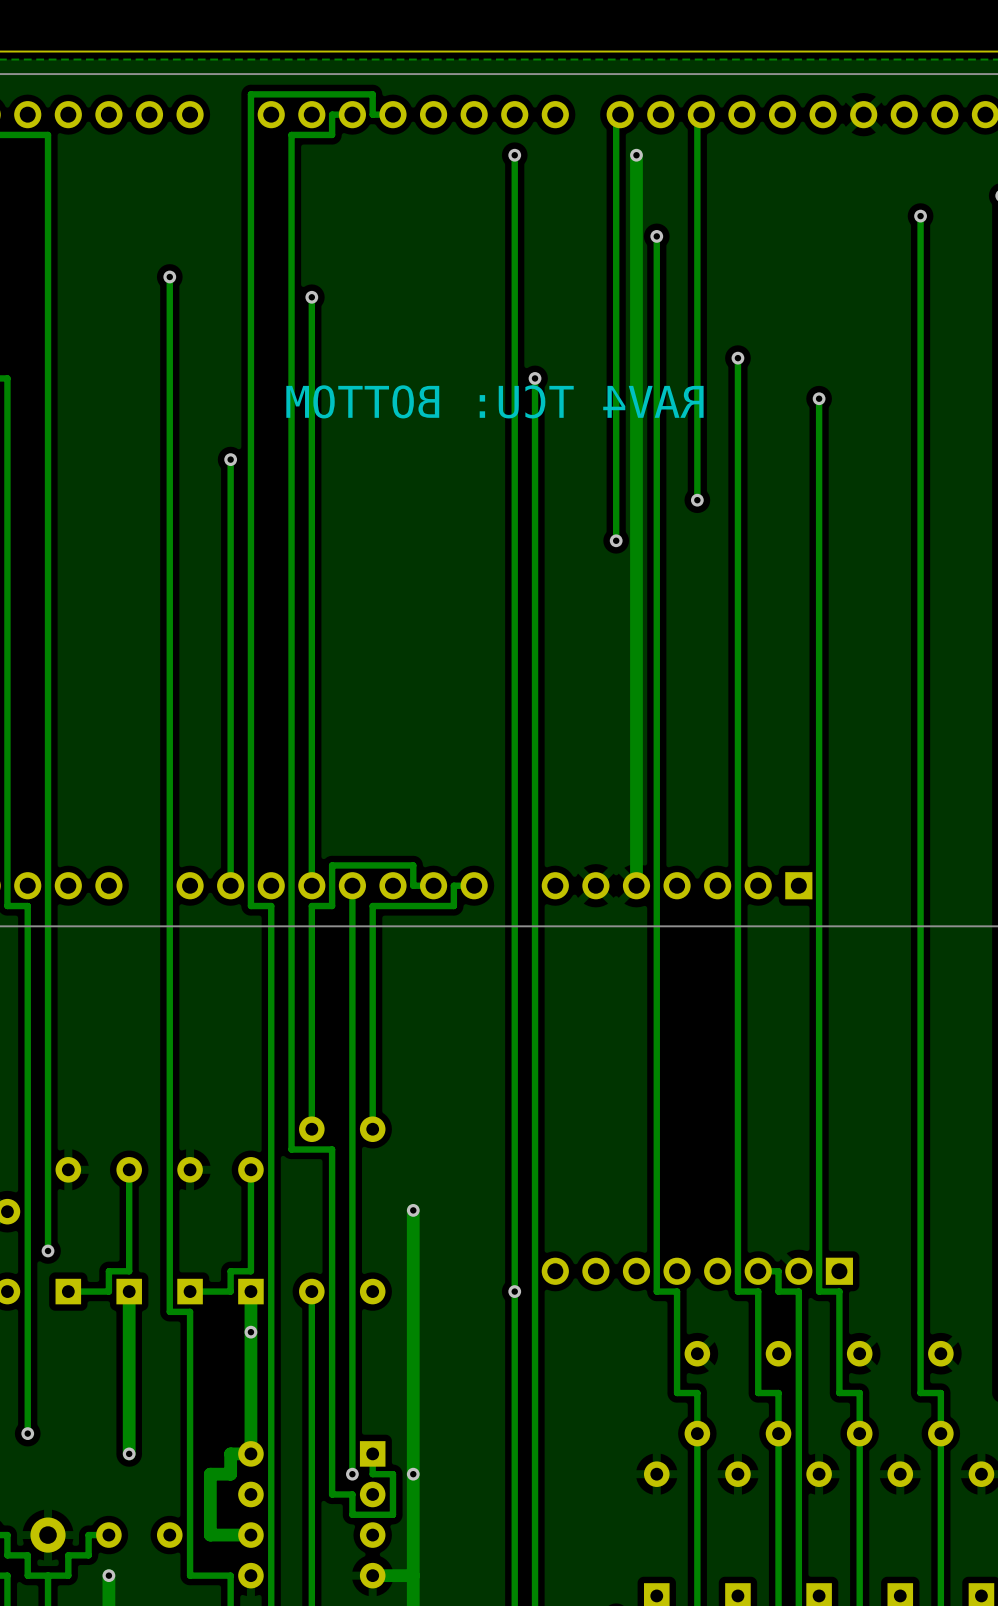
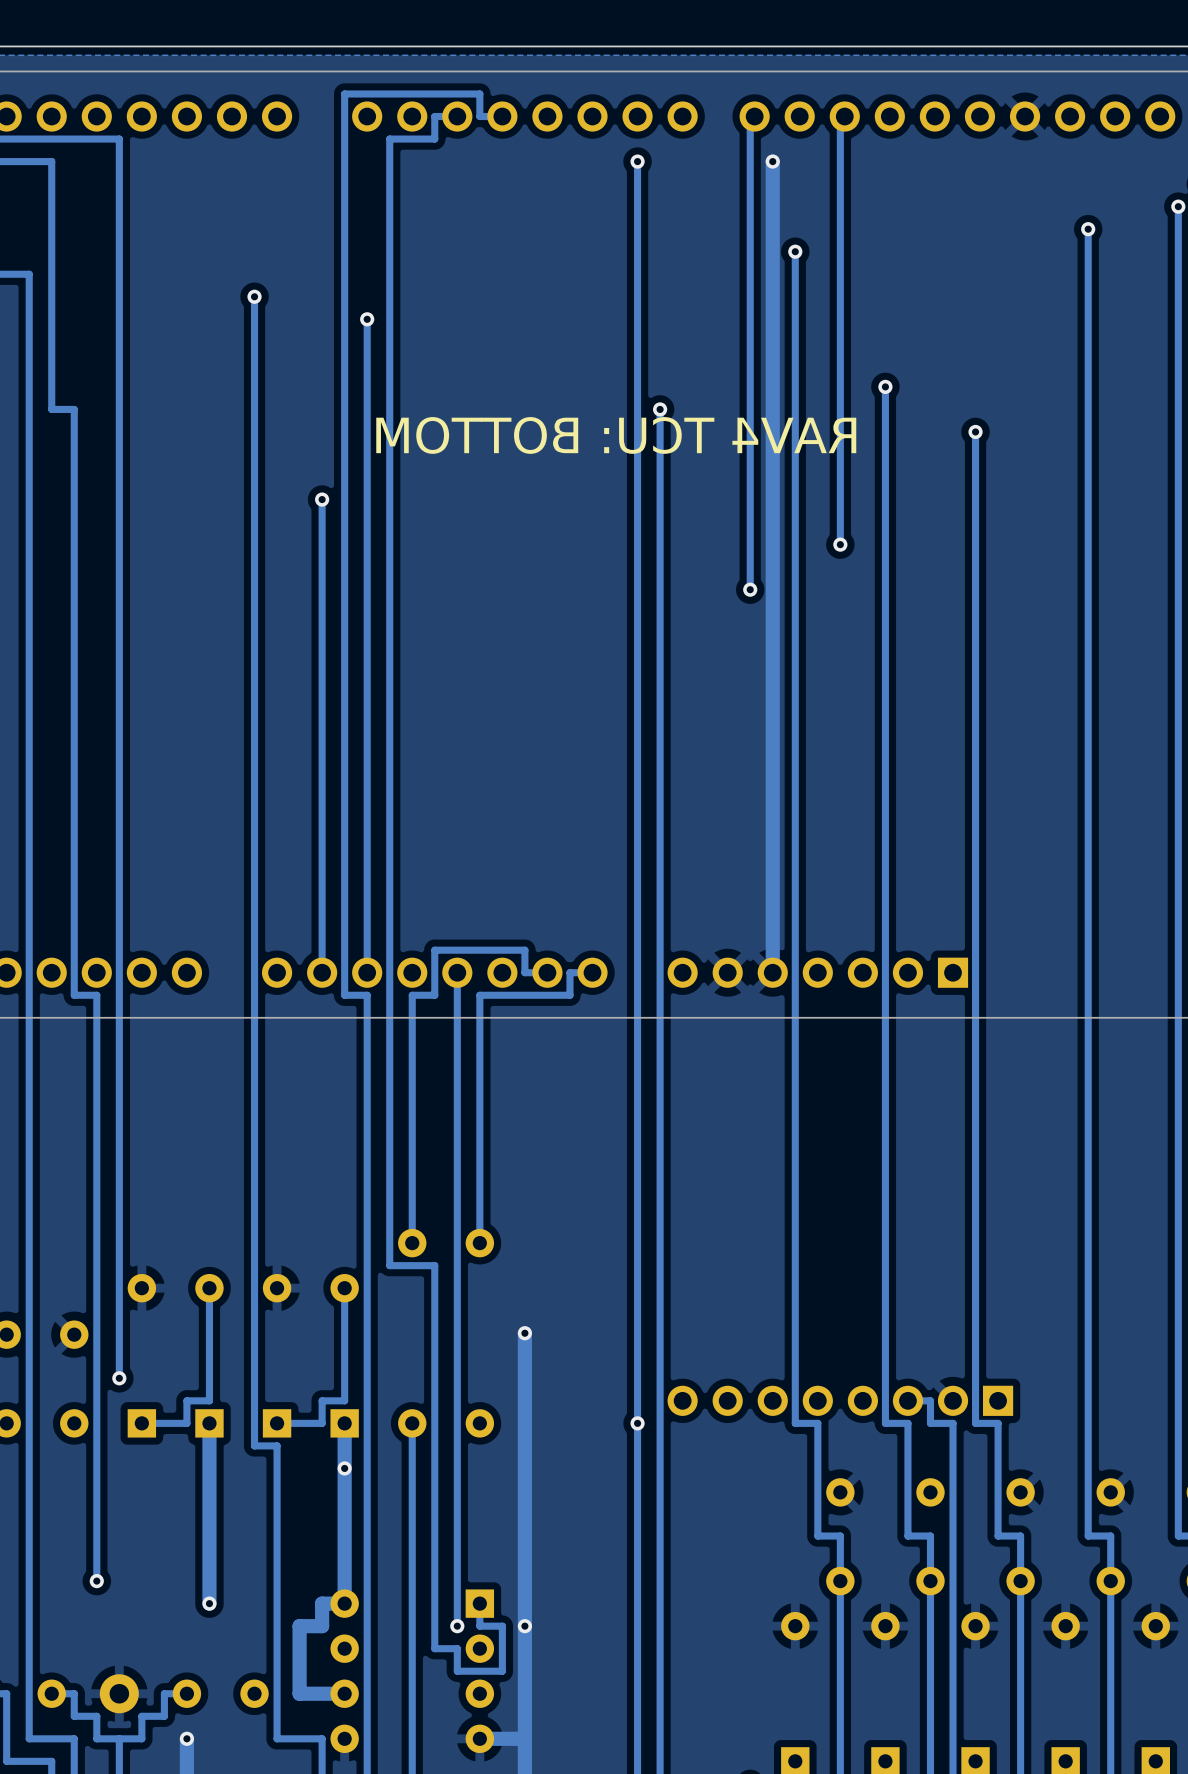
track: (311, 297) (311, 885) -> (367, 319) (367, 972)
via position: (311, 297) -> (367, 319)

